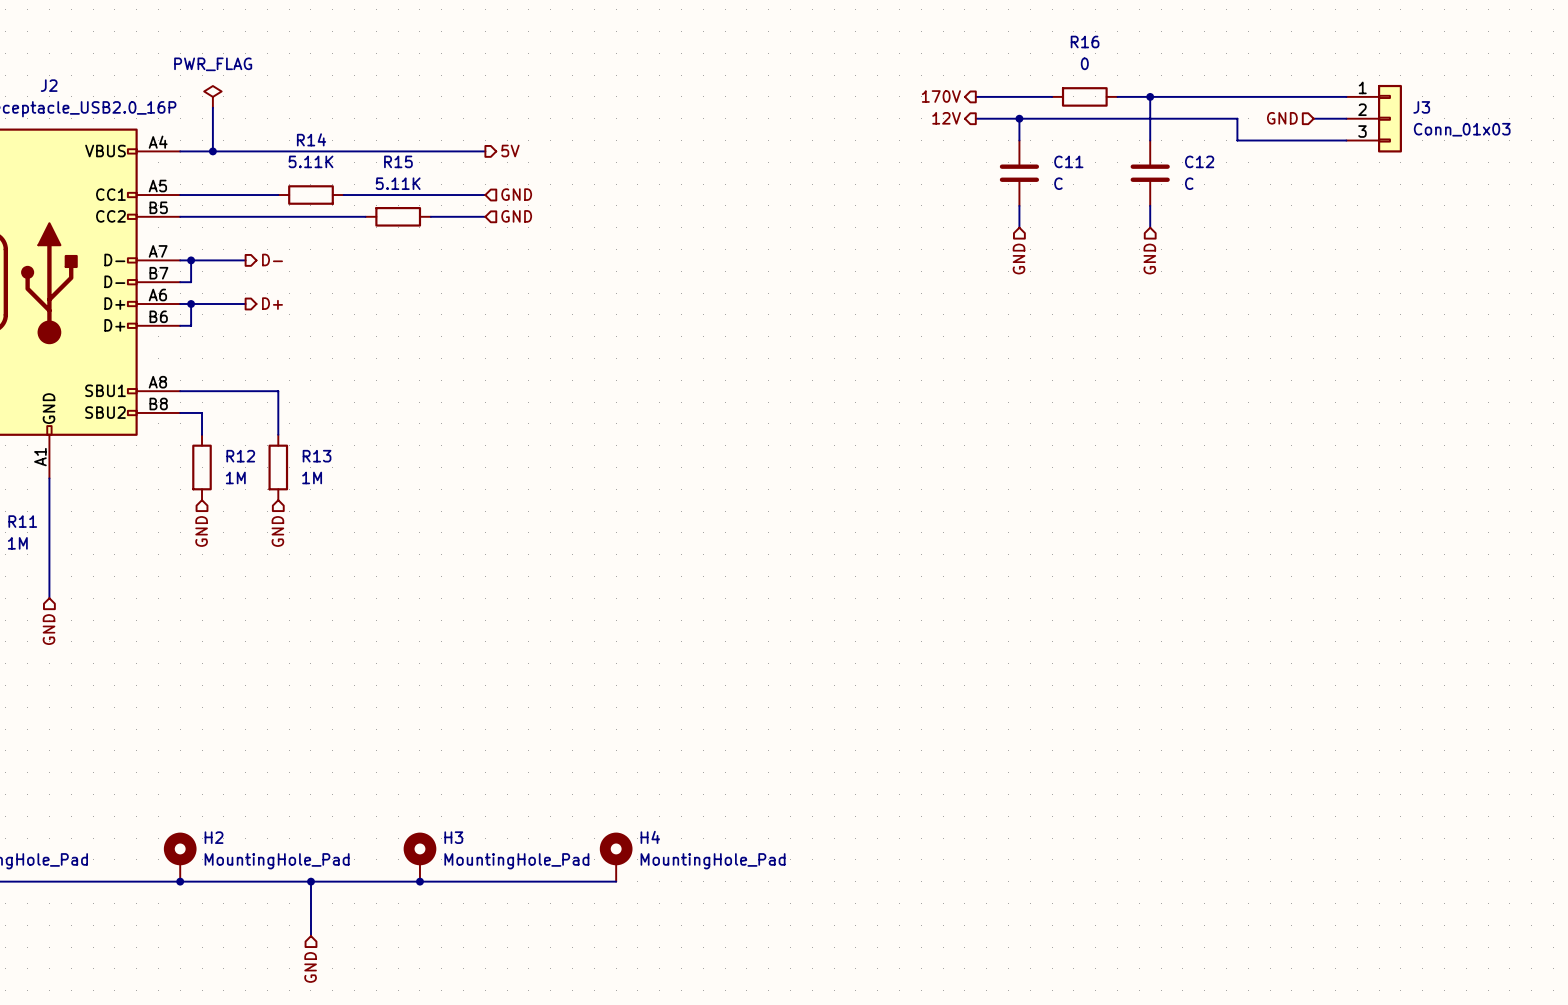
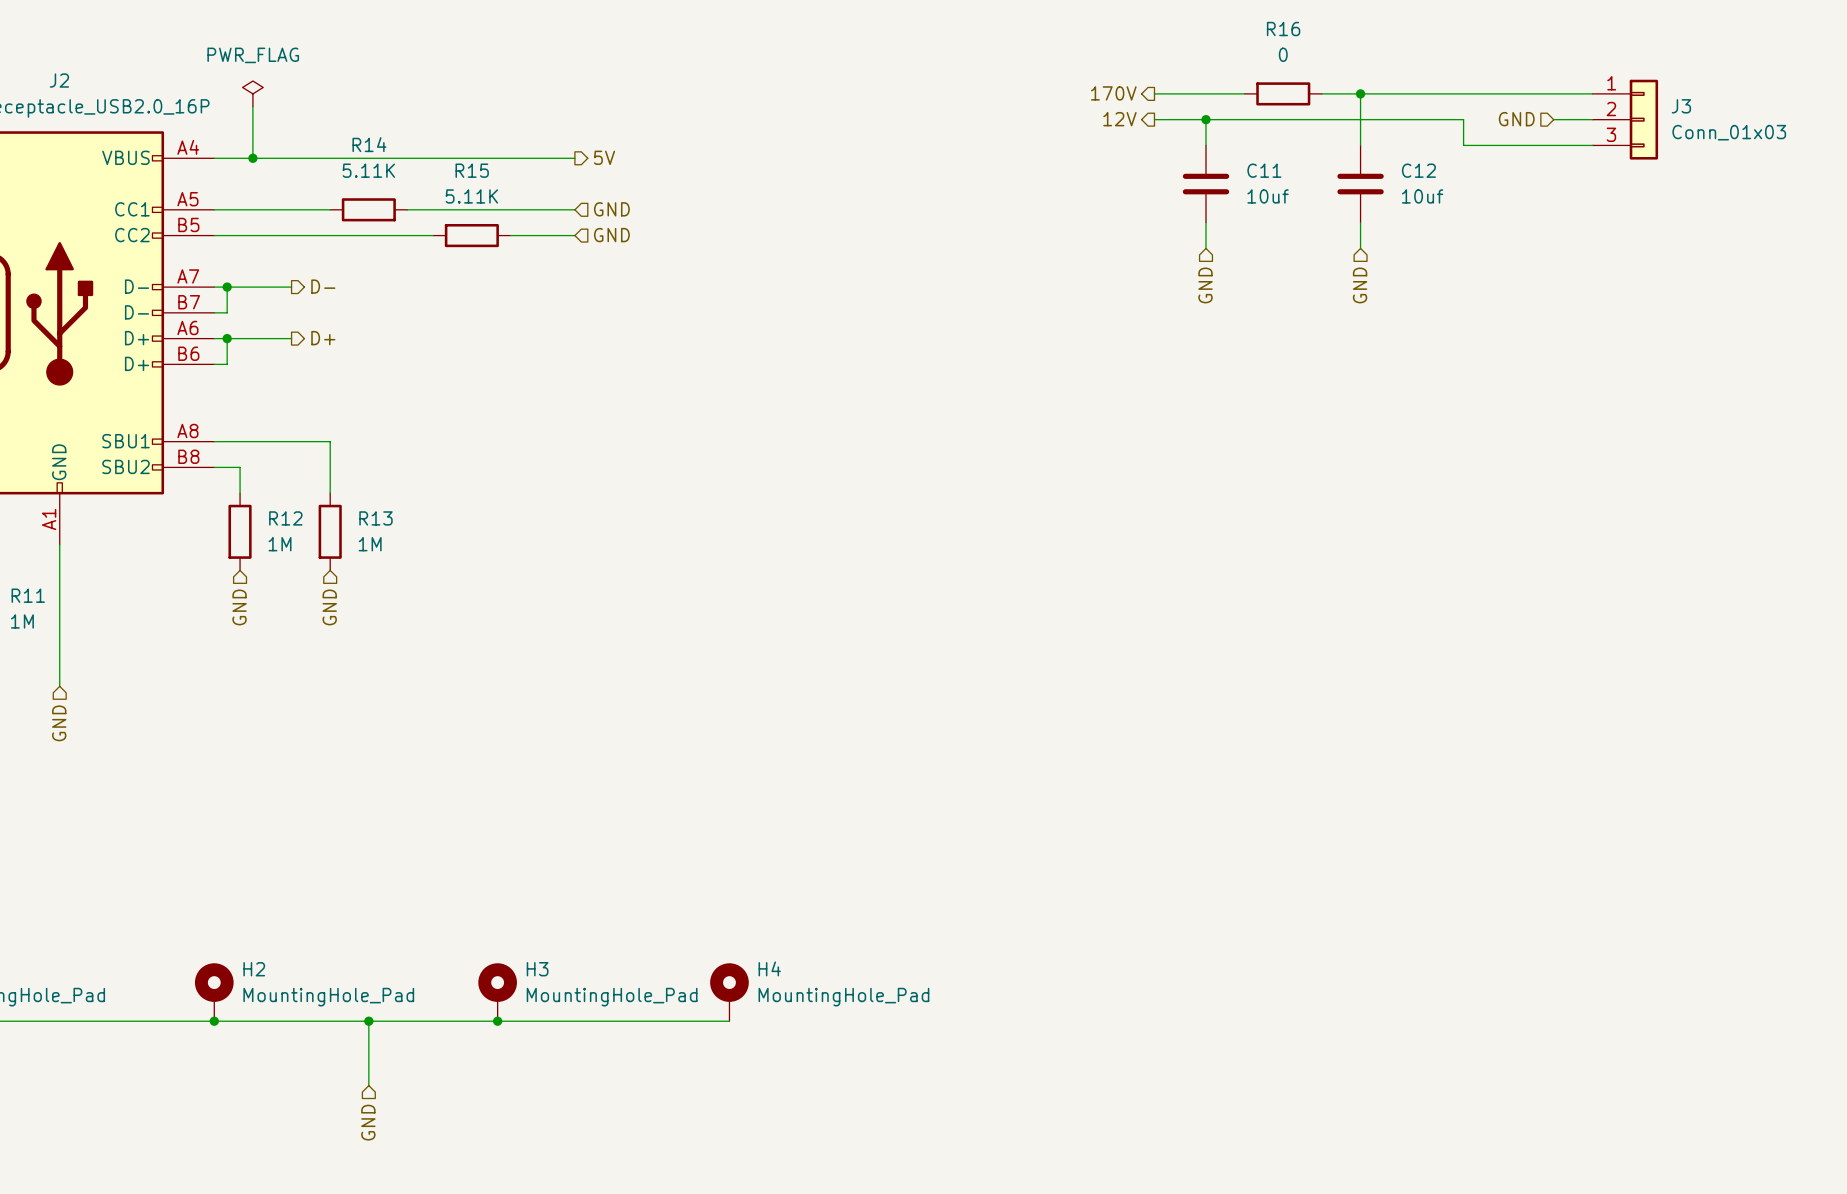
C11 value: C (1058, 183) -> 10uf (1268, 196)
C12 value: C (1189, 183) -> 10uf (1422, 196)

